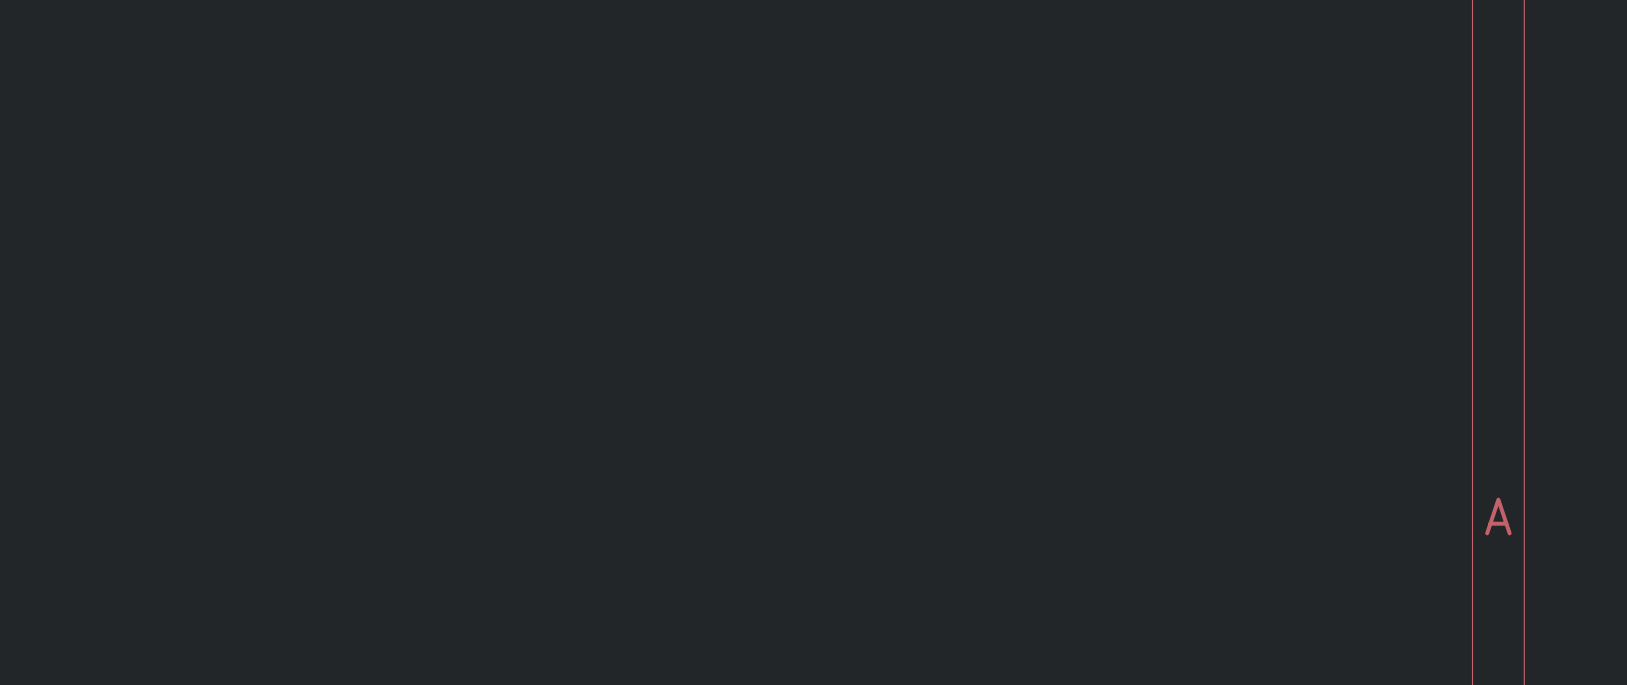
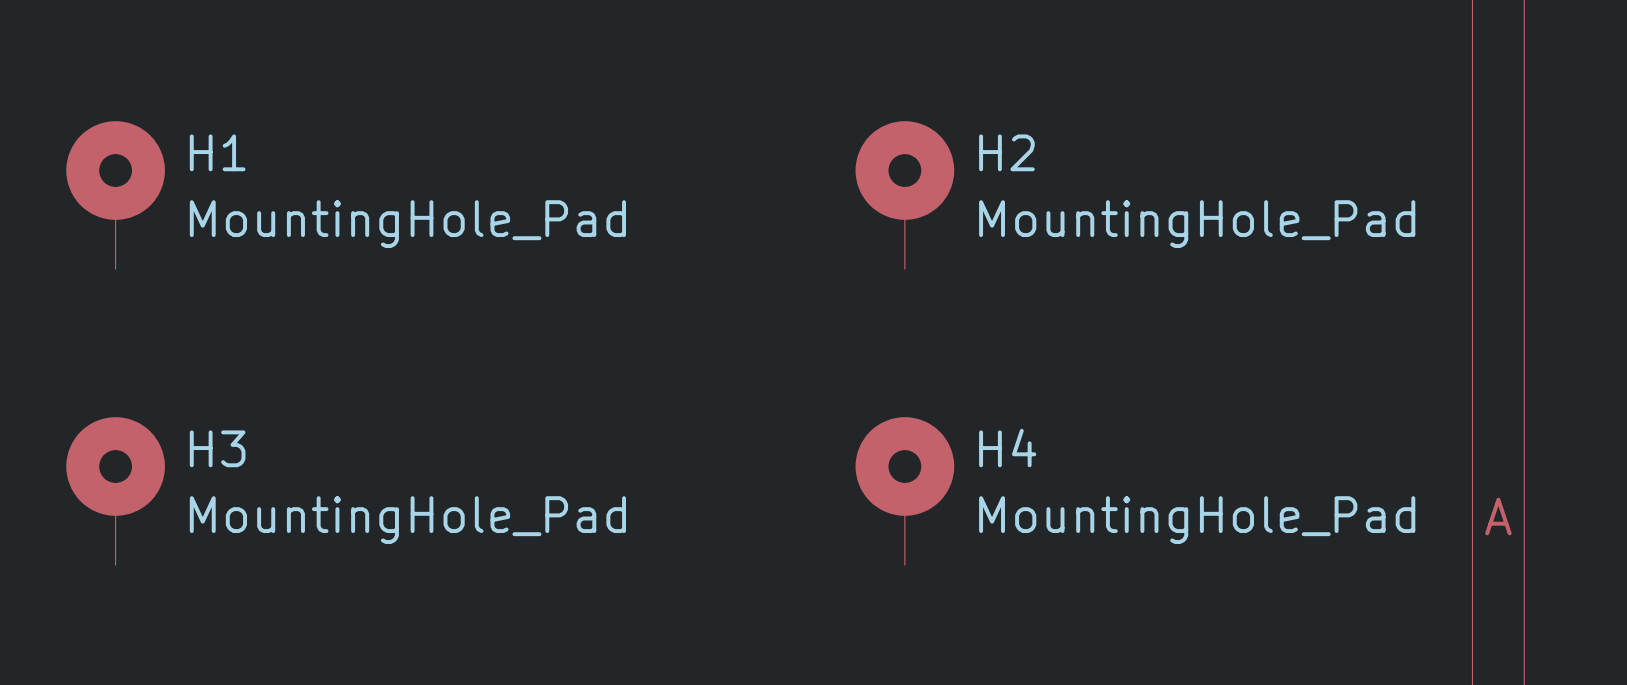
H1: none -> MountingHole_Pad (115, 195)
H2: none -> MountingHole_Pad (904, 195)
H3: none -> MountingHole_Pad (115, 491)
H4: none -> MountingHole_Pad (904, 491)

